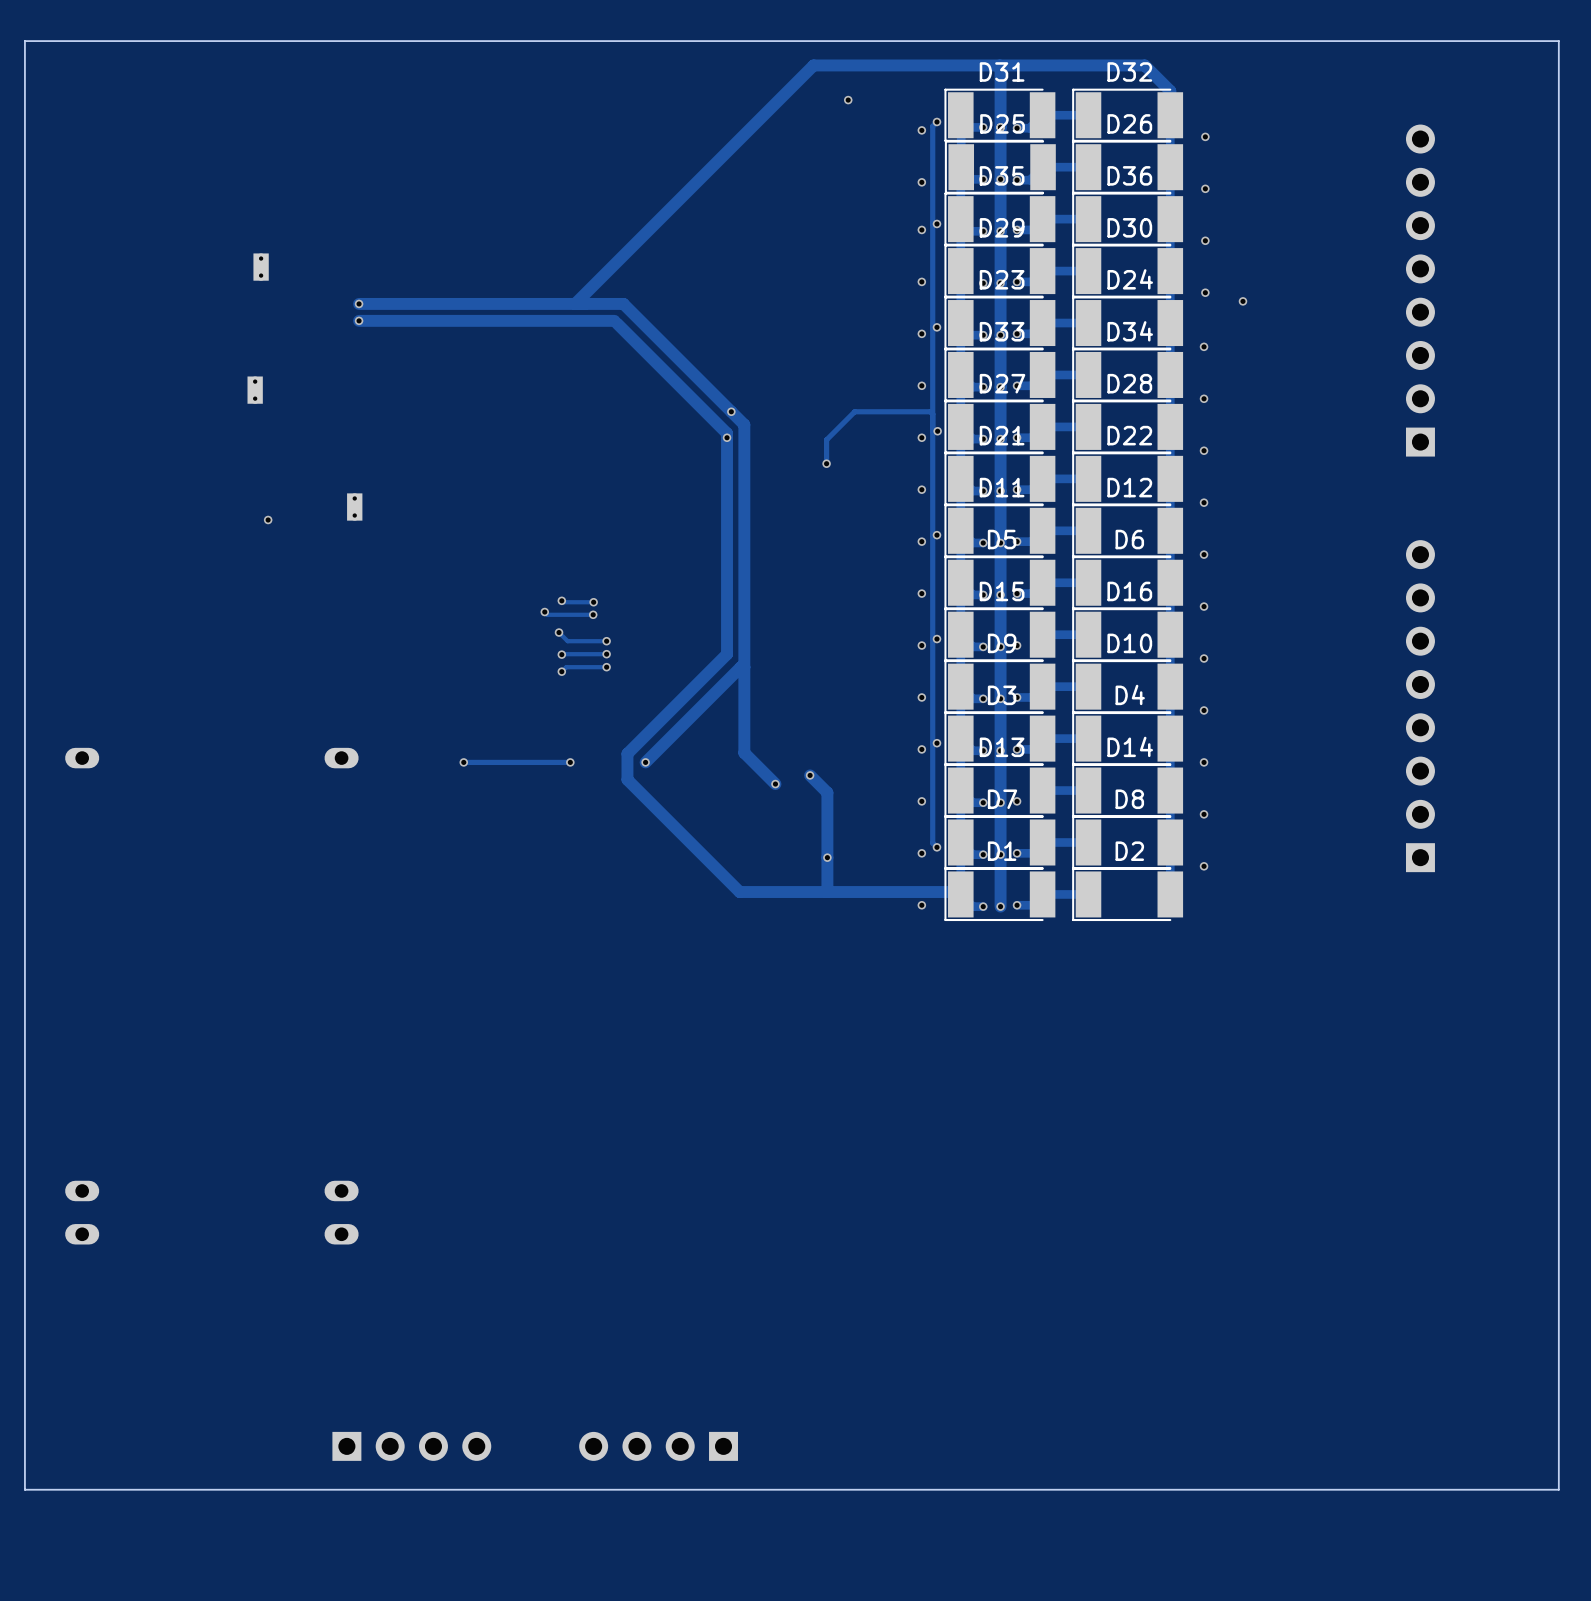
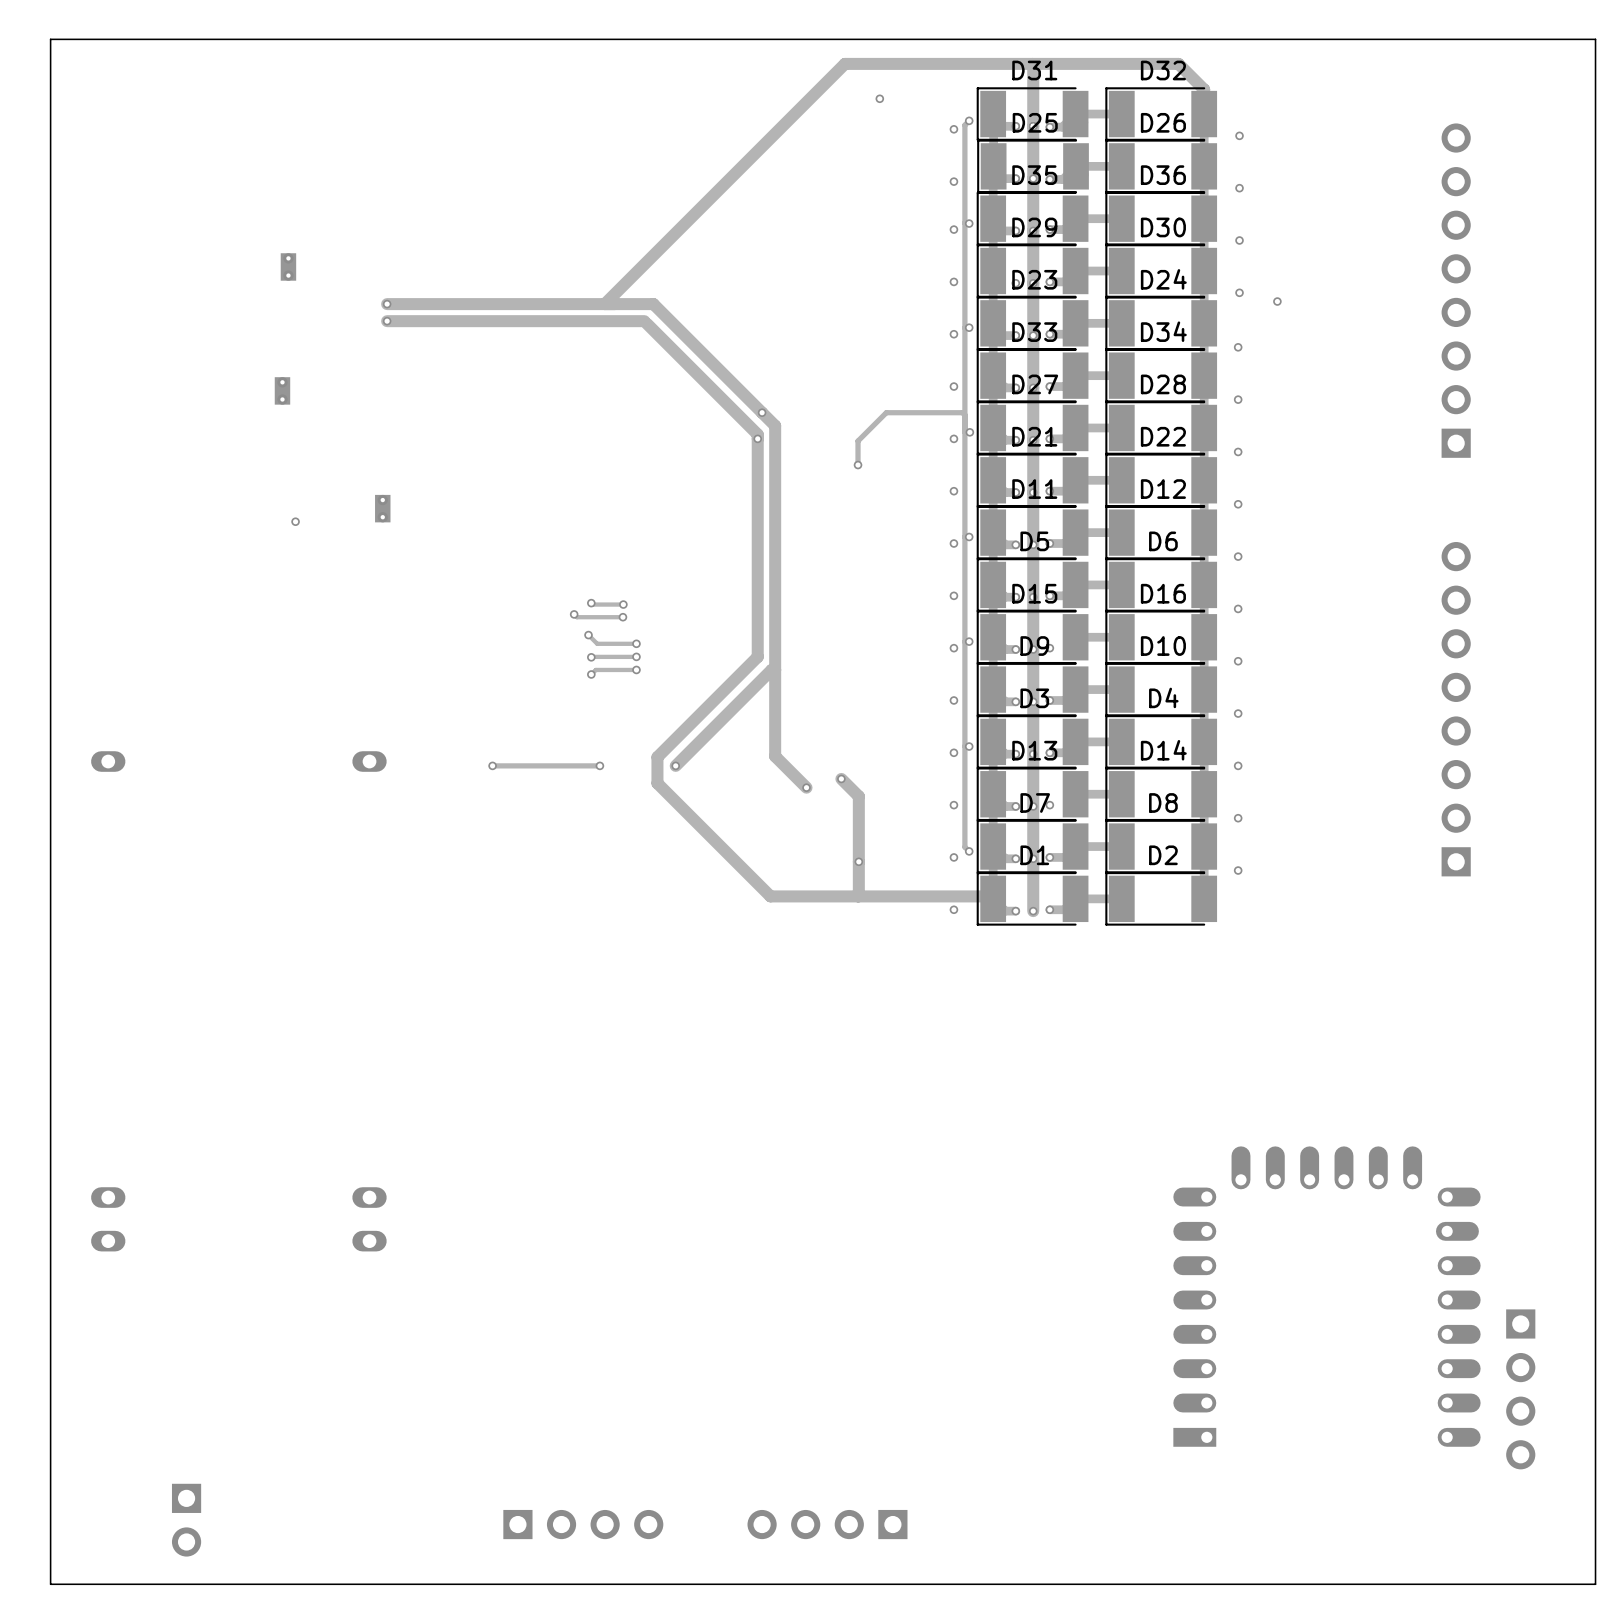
part: none -> (1326, 1296)
part: none -> (1520, 1389)
part: (411, 1446) -> none
part: (658, 1446) -> none
board edge: (1558, 1489) (24, 1489) -> (1595, 1498) (1595, 1584) (50, 1584) (50, 1498)
part: none -> (186, 1520)
part: none -> (583, 1524)
part: none -> (827, 1524)

